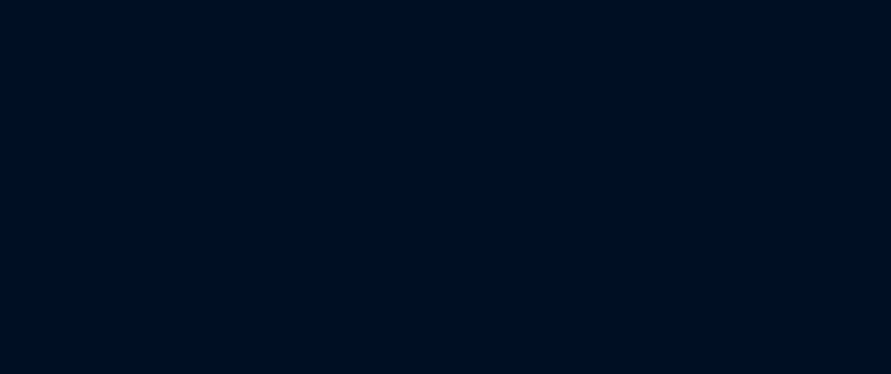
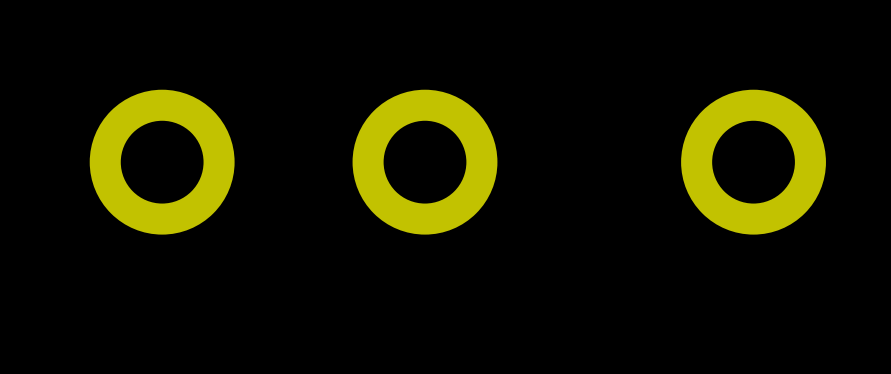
part: none -> (162, 162)
part: none -> (424, 162)
part: none -> (753, 162)

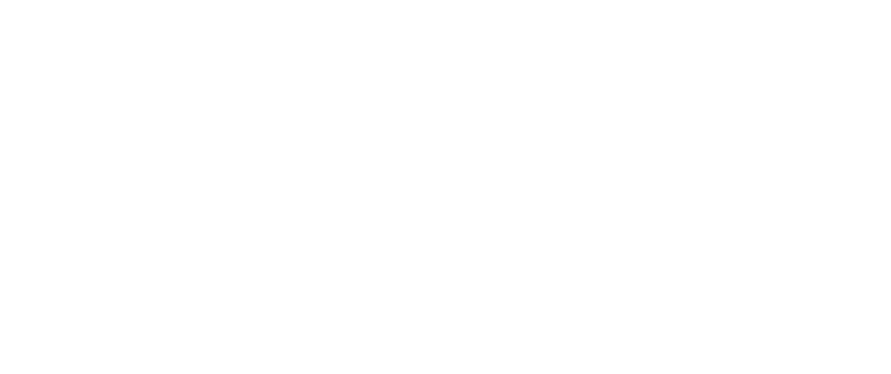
part: (162, 162) -> none
part: (424, 162) -> none
part: (753, 162) -> none

